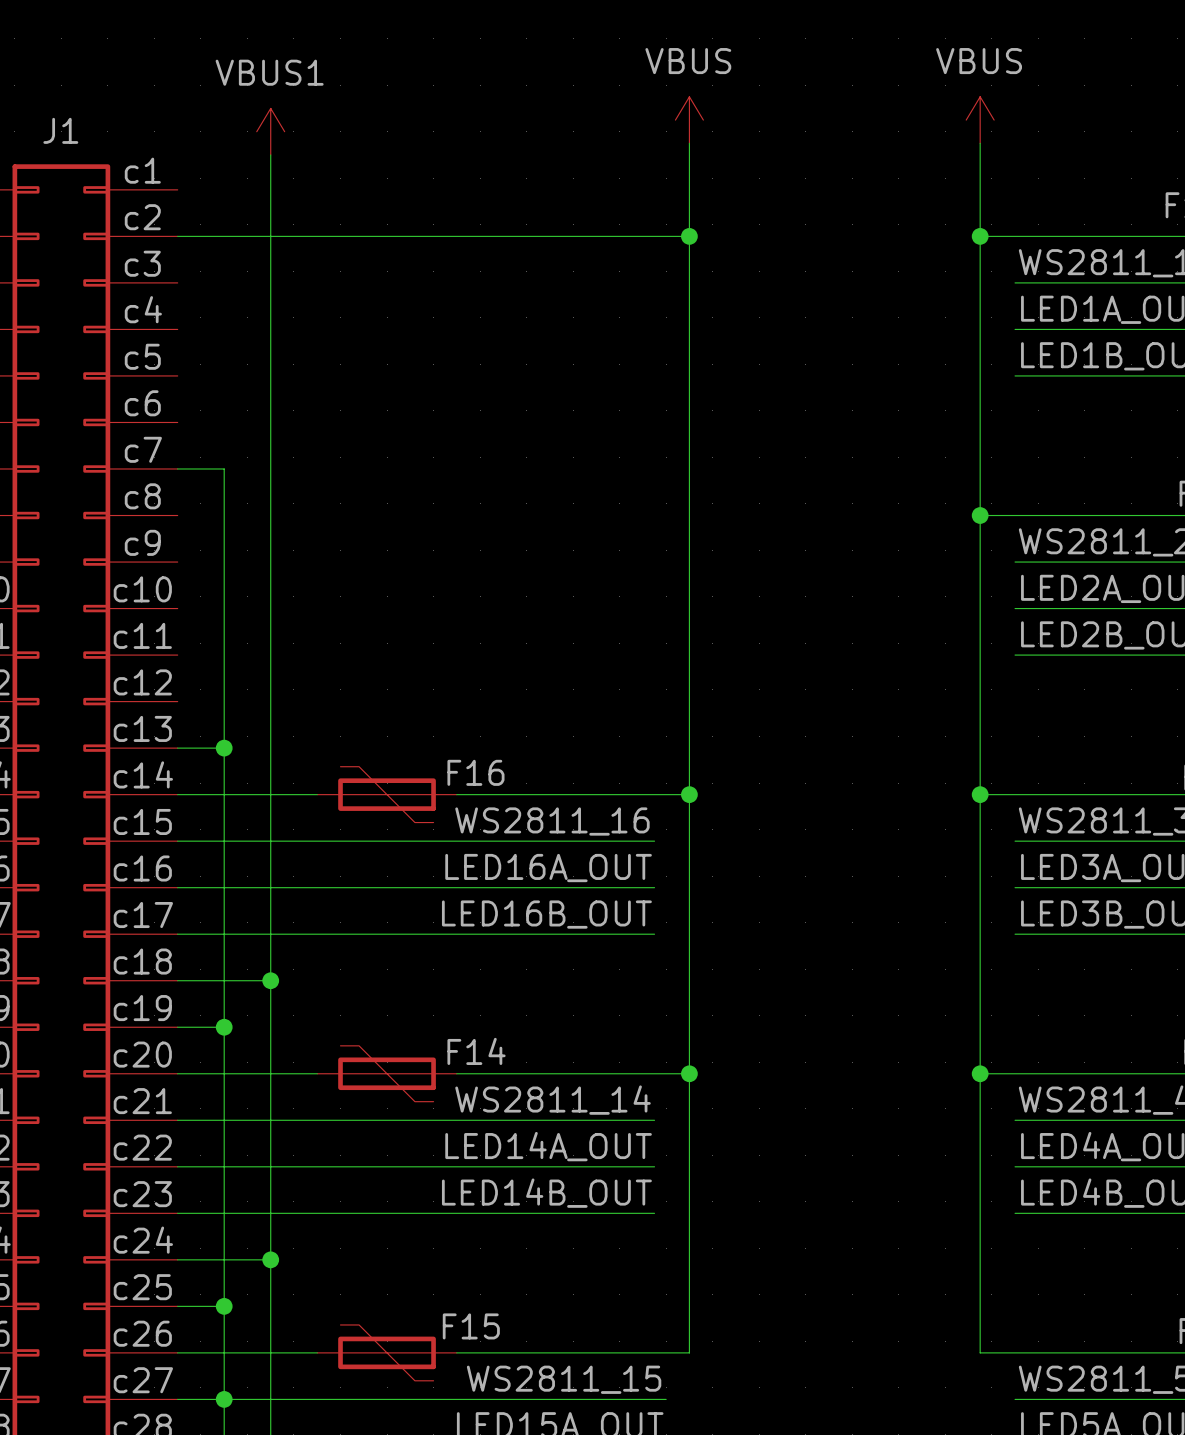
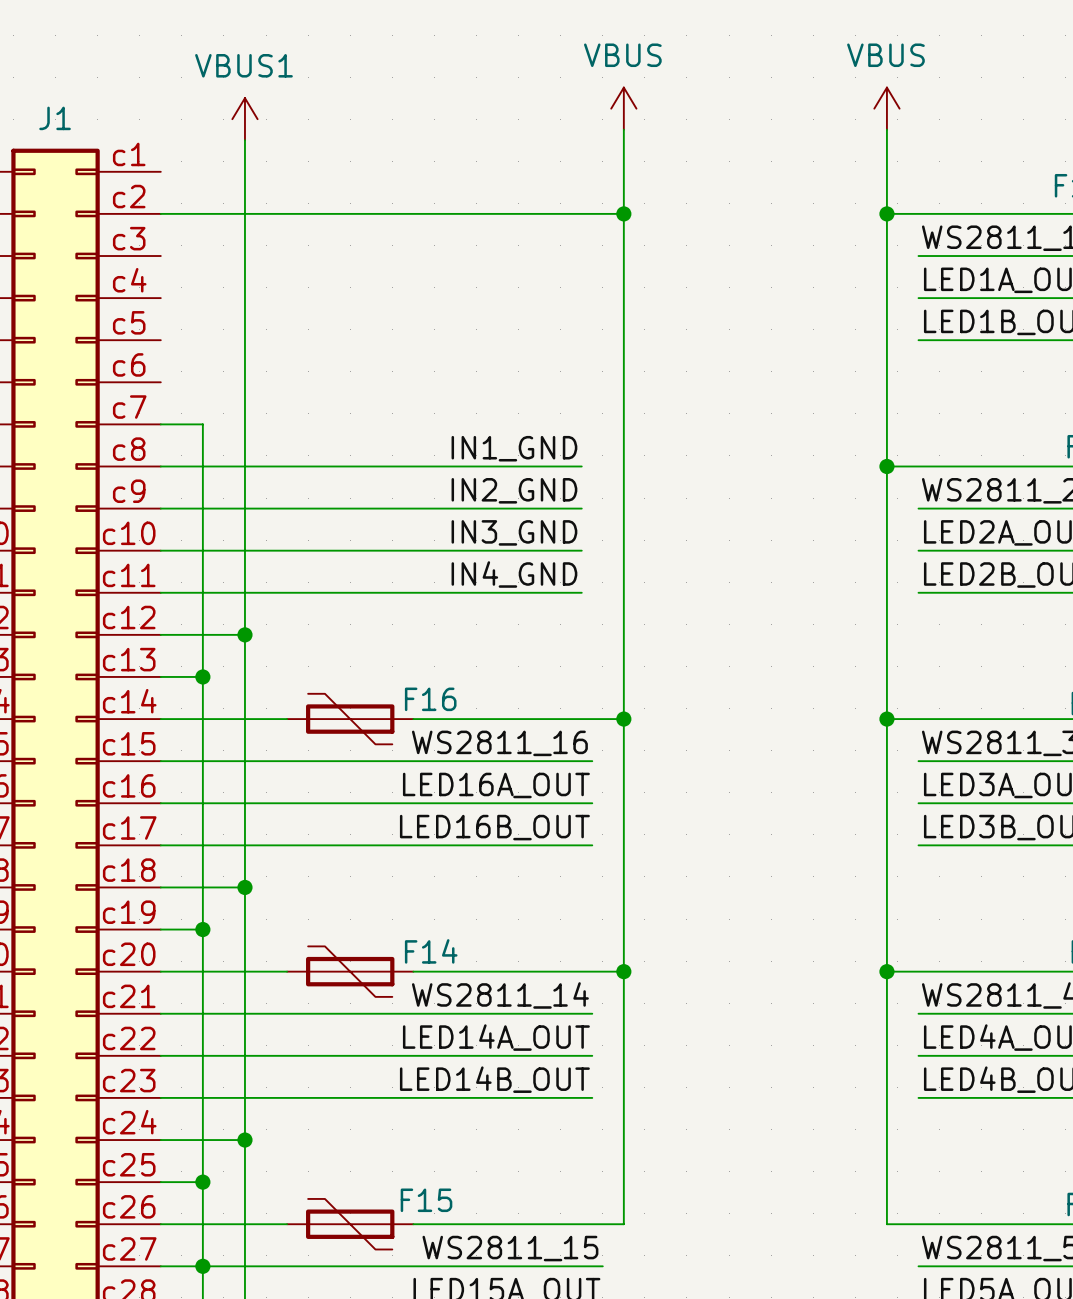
label: none -> IN1_GND (514, 448)
wire: none -> (160, 466) (581, 466)
label: none -> IN2_GND (514, 490)
wire: none -> (160, 508) (581, 508)
label: none -> IN3_GND (514, 532)
wire: none -> (160, 550) (581, 550)
label: none -> IN4_GND (514, 574)
wire: none -> (160, 592) (581, 592)
wire: none -> (160, 634) (244, 634)
junction: none -> (244, 634)

